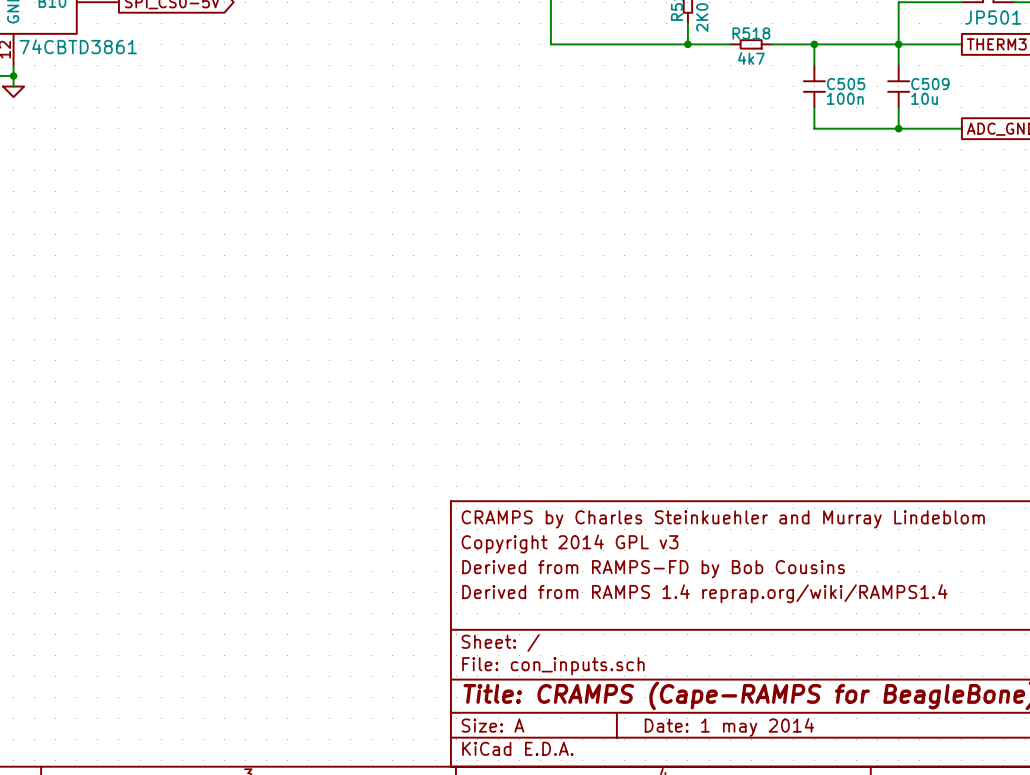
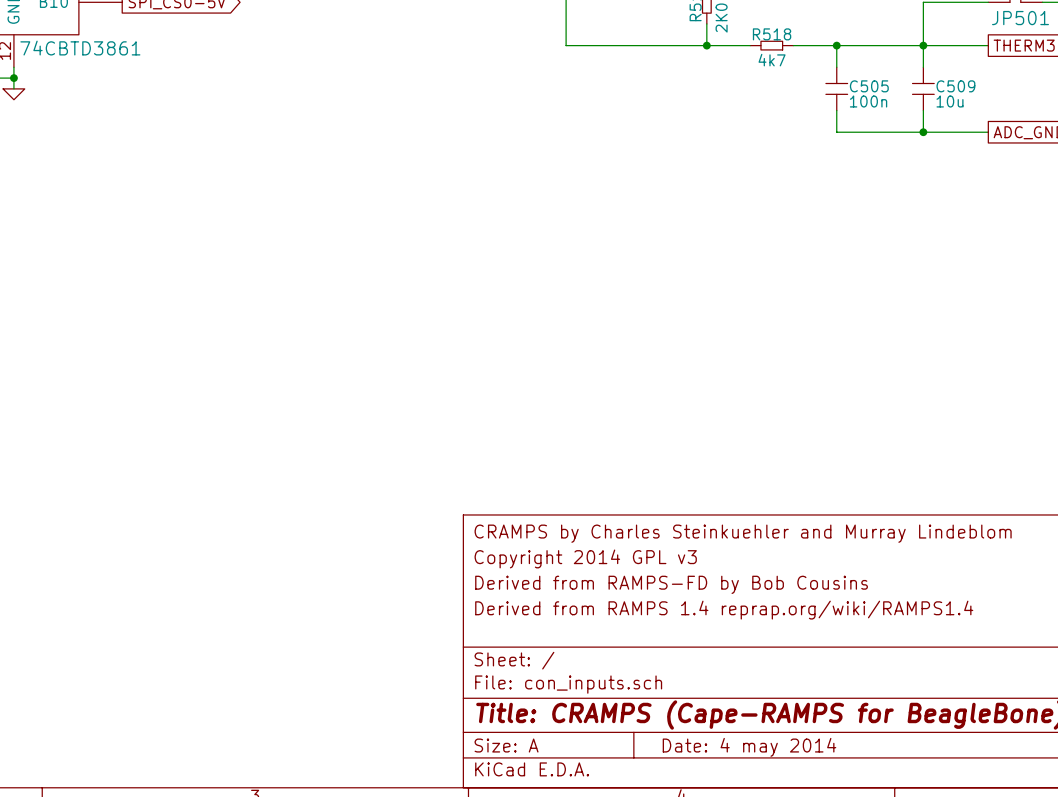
title block: Date: 1 may 2014 (729, 727) -> Date: 4 may 2014 (749, 747)

